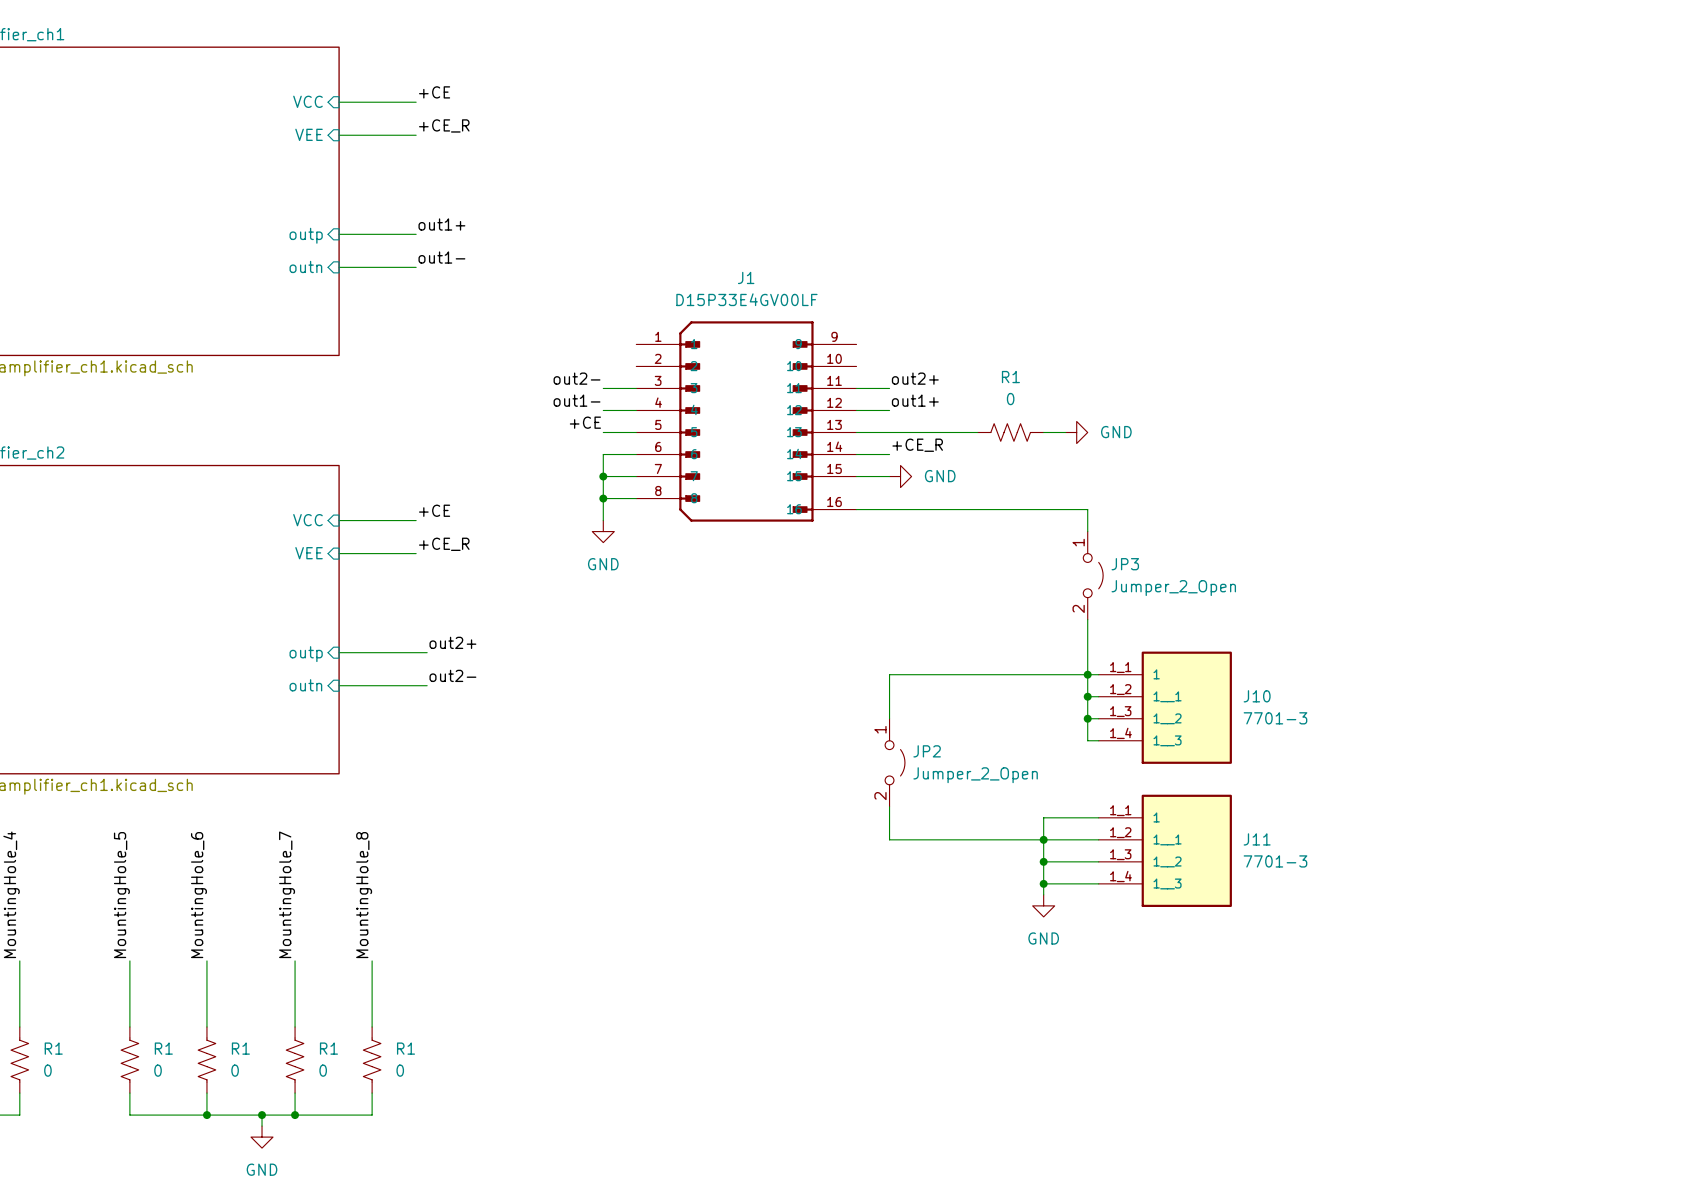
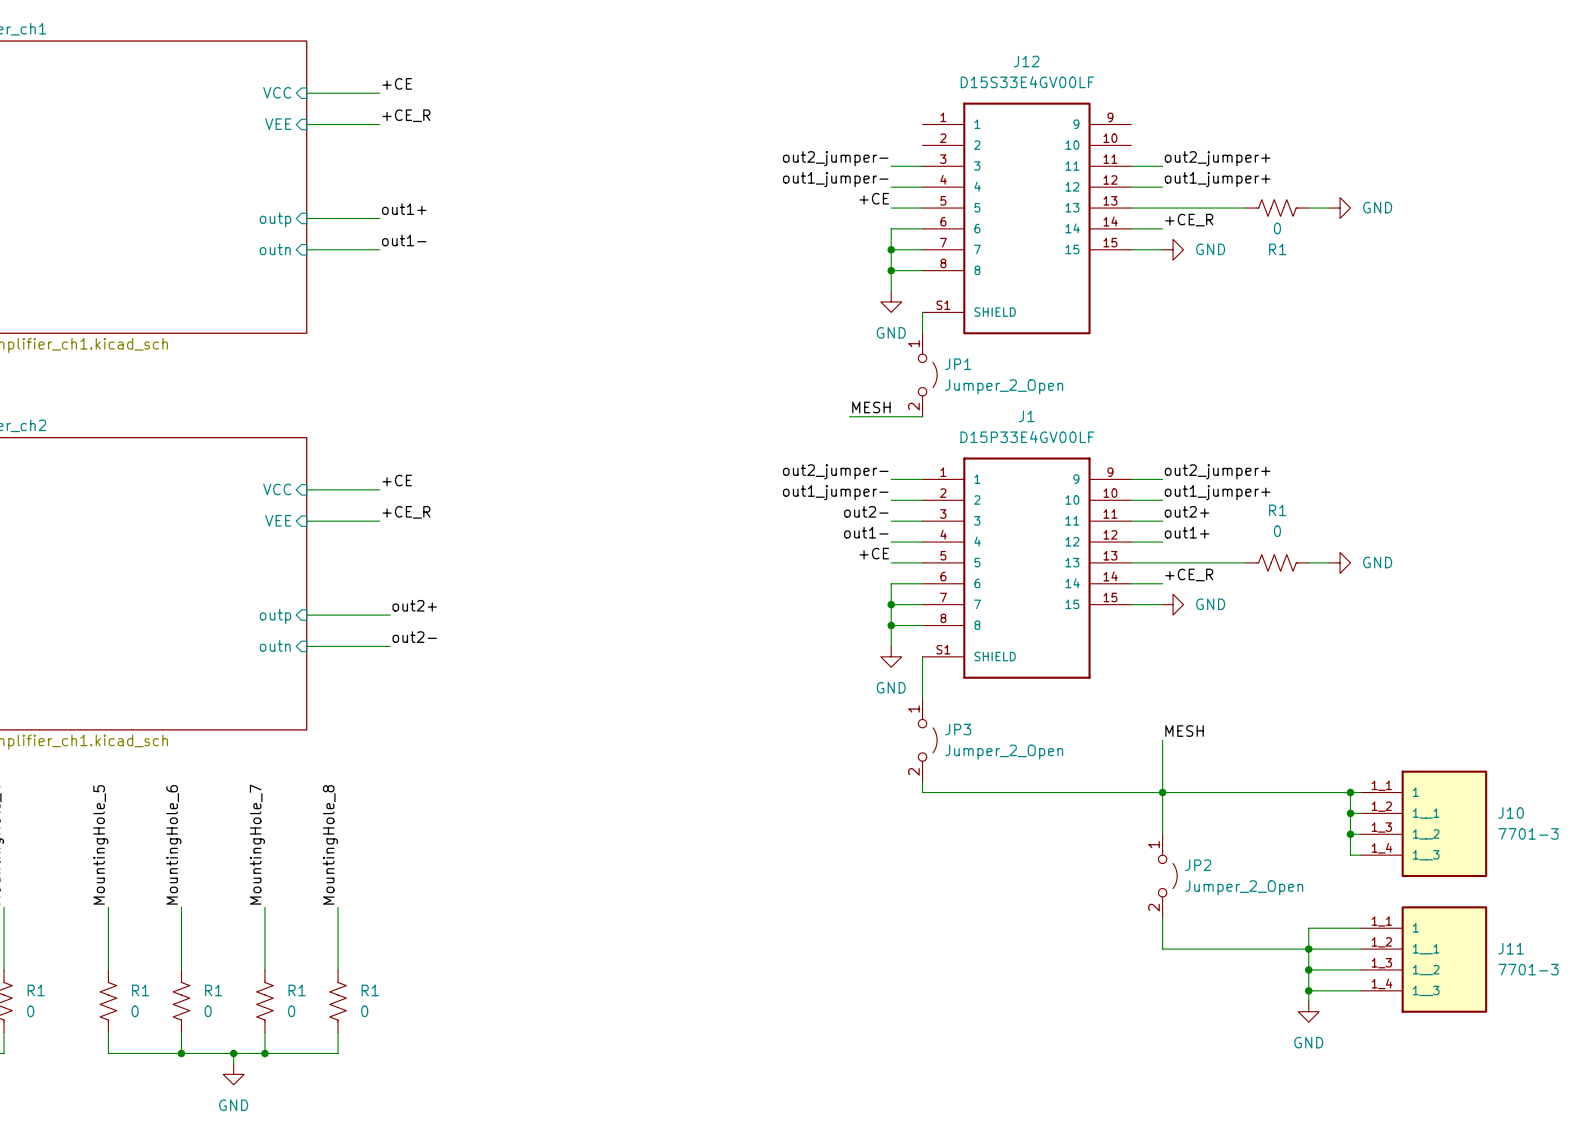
label: none -> out2_jumper- (835, 158)
label: none -> out2_jumper+ (1217, 158)
wire: none -> (891, 166) (922, 166)
wire: none -> (1131, 166) (1162, 166)
label: none -> out1_jumper- (835, 179)
label: none -> out1_jumper+ (1217, 179)
wire: none -> (891, 187) (922, 187)
wire: none -> (1131, 187) (1162, 187)
label: none -> +CE (874, 198)
wire: none -> (1131, 208) (1246, 208)
R1: none -> 0 (1277, 208)
wire: none -> (1308, 208) (1329, 208)
power symbol: none -> GND (1340, 208)
J12: none -> D15S33E4GV00LF (1026, 218)
label: none -> +CE_R (1189, 220)
wire: none -> (922, 228) (891, 228) (891, 291)
wire: none -> (1131, 228) (1162, 228)
junction: none -> (891, 249)
wire: none -> (1131, 249) (1162, 249)
power symbol: none -> GND (1173, 249)
junction: none -> (891, 270)
J1 symbol: [636, 321, 857, 522] -> [922, 457, 1132, 679]
power symbol: none -> GND (891, 301)
wire: none -> (922, 312) (922, 333)
label: out2- (577, 378) -> none
label: out2+ (915, 378) -> none
wire: (603, 388) (636, 388) -> none
wire: (856, 388) (889, 388) -> (891, 542) (922, 542)
JP1: none -> Jumper_2_Open (927, 375)
label: out1- (577, 400) -> none
label: out1+ (915, 400) -> none
wire: (603, 410) (636, 410) -> none
wire: (856, 410) (889, 410) -> (891, 208) (922, 208)
label: +CE (585, 422) -> none
wire: (603, 432) (636, 432) -> none
wire: (856, 432) (977, 432) -> none
R1: 0 (1010, 432) -> none
wire: (1043, 432) (1065, 432) -> none
power symbol: GND (1076, 432) -> none
label: none -> MESH (871, 407)
wire: none -> (849, 416) (922, 416)
label: +CE_R (917, 445) -> none
wire: (636, 454) (603, 454) (603, 520) -> none
wire: (856, 454) (889, 454) -> (891, 249) (922, 249)
wire: (603, 476) (636, 476) -> none
junction: (603, 476) -> none
wire: (856, 476) (889, 476) -> (891, 270) (922, 270)
power symbol: GND (900, 476) -> none
wire: (603, 498) (636, 498) -> none
junction: (603, 498) -> none
label: none -> out2_jumper- (835, 471)
label: none -> out2_jumper+ (1217, 471)
wire: (856, 509) (955, 509) -> none
wire: (988, 509) (1087, 509) (1087, 531) -> none
wire: none -> (1131, 479) (1162, 479)
label: none -> out1_jumper- (835, 492)
label: none -> out1_jumper+ (1217, 492)
power symbol: GND (603, 531) -> none
wire: none -> (891, 500) (922, 500)
wire: none -> (1131, 500) (1162, 500)
label: none -> out2- (866, 511)
label: none -> out2+ (1187, 511)
wire: none -> (891, 521) (922, 521)
wire: none -> (1131, 521) (1162, 521)
label: none -> out1- (866, 532)
label: none -> out1+ (1187, 532)
JP3 position: (1093, 575) -> (927, 740)
wire: none -> (1131, 542) (1162, 542)
label: none -> +CE (874, 553)
wire: none -> (891, 562) (922, 562)
wire: none -> (1131, 562) (1246, 562)
R1: none -> 0 (1277, 562)
wire: none -> (1308, 562) (1329, 562)
power symbol: none -> GND (1340, 562)
label: none -> +CE_R (1189, 574)
wire: none -> (922, 583) (891, 583) (891, 646)
wire: (1087, 619) (1087, 740) (1098, 740) -> none
wire: none -> (1131, 583) (1162, 583)
wire: none -> (891, 604) (922, 604)
junction: none -> (891, 604)
wire: none -> (1131, 604) (1162, 604)
power symbol: none -> GND (1173, 604)
wire: none -> (891, 625) (922, 625)
junction: none -> (891, 625)
junction: (1087, 674) -> none
wire: (1098, 674) (889, 674) (889, 718) -> none
power symbol: none -> GND (891, 656)
wire: none -> (922, 656) (922, 698)
wire: (1087, 696) (1098, 696) -> none
junction: (1087, 696) -> none
J10 position: (1165, 707) -> (1424, 823)
junction: (1087, 718) -> none
JP2 position: (895, 762) -> (1167, 876)
label: none -> MESH (1184, 731)
wire: none -> (1162, 740) (1162, 834)
wire: (889, 806) (889, 839) (988, 839) -> (922, 782) (922, 792)
wire: (1098, 817) (1043, 817) (1043, 894) -> none
junction: (1043, 839) -> none
wire: none -> (1026, 792) (1360, 792)
junction: none -> (1162, 792)
wire: none -> (1350, 792) (1350, 855) (1360, 855)
junction: none -> (1350, 792)
J11 position: (1165, 850) -> (1424, 959)
wire: (1043, 861) (1098, 861) -> none
junction: (1043, 861) -> none
wire: none -> (1350, 813) (1360, 813)
junction: none -> (1350, 813)
wire: (1043, 883) (1098, 883) -> none
junction: (1043, 883) -> none
wire: none -> (1350, 834) (1360, 834)
junction: none -> (1350, 834)
power symbol: GND (1043, 905) -> none
wire: none -> (1162, 917) (1162, 949) (1360, 949)
wire: none -> (1360, 928) (1308, 928) (1308, 1001)
junction: none -> (1308, 949)
wire: none -> (1308, 969) (1360, 969)
junction: none -> (1308, 969)
wire: none -> (1308, 990) (1360, 990)
junction: none -> (1308, 990)
power symbol: none -> GND (1308, 1011)

